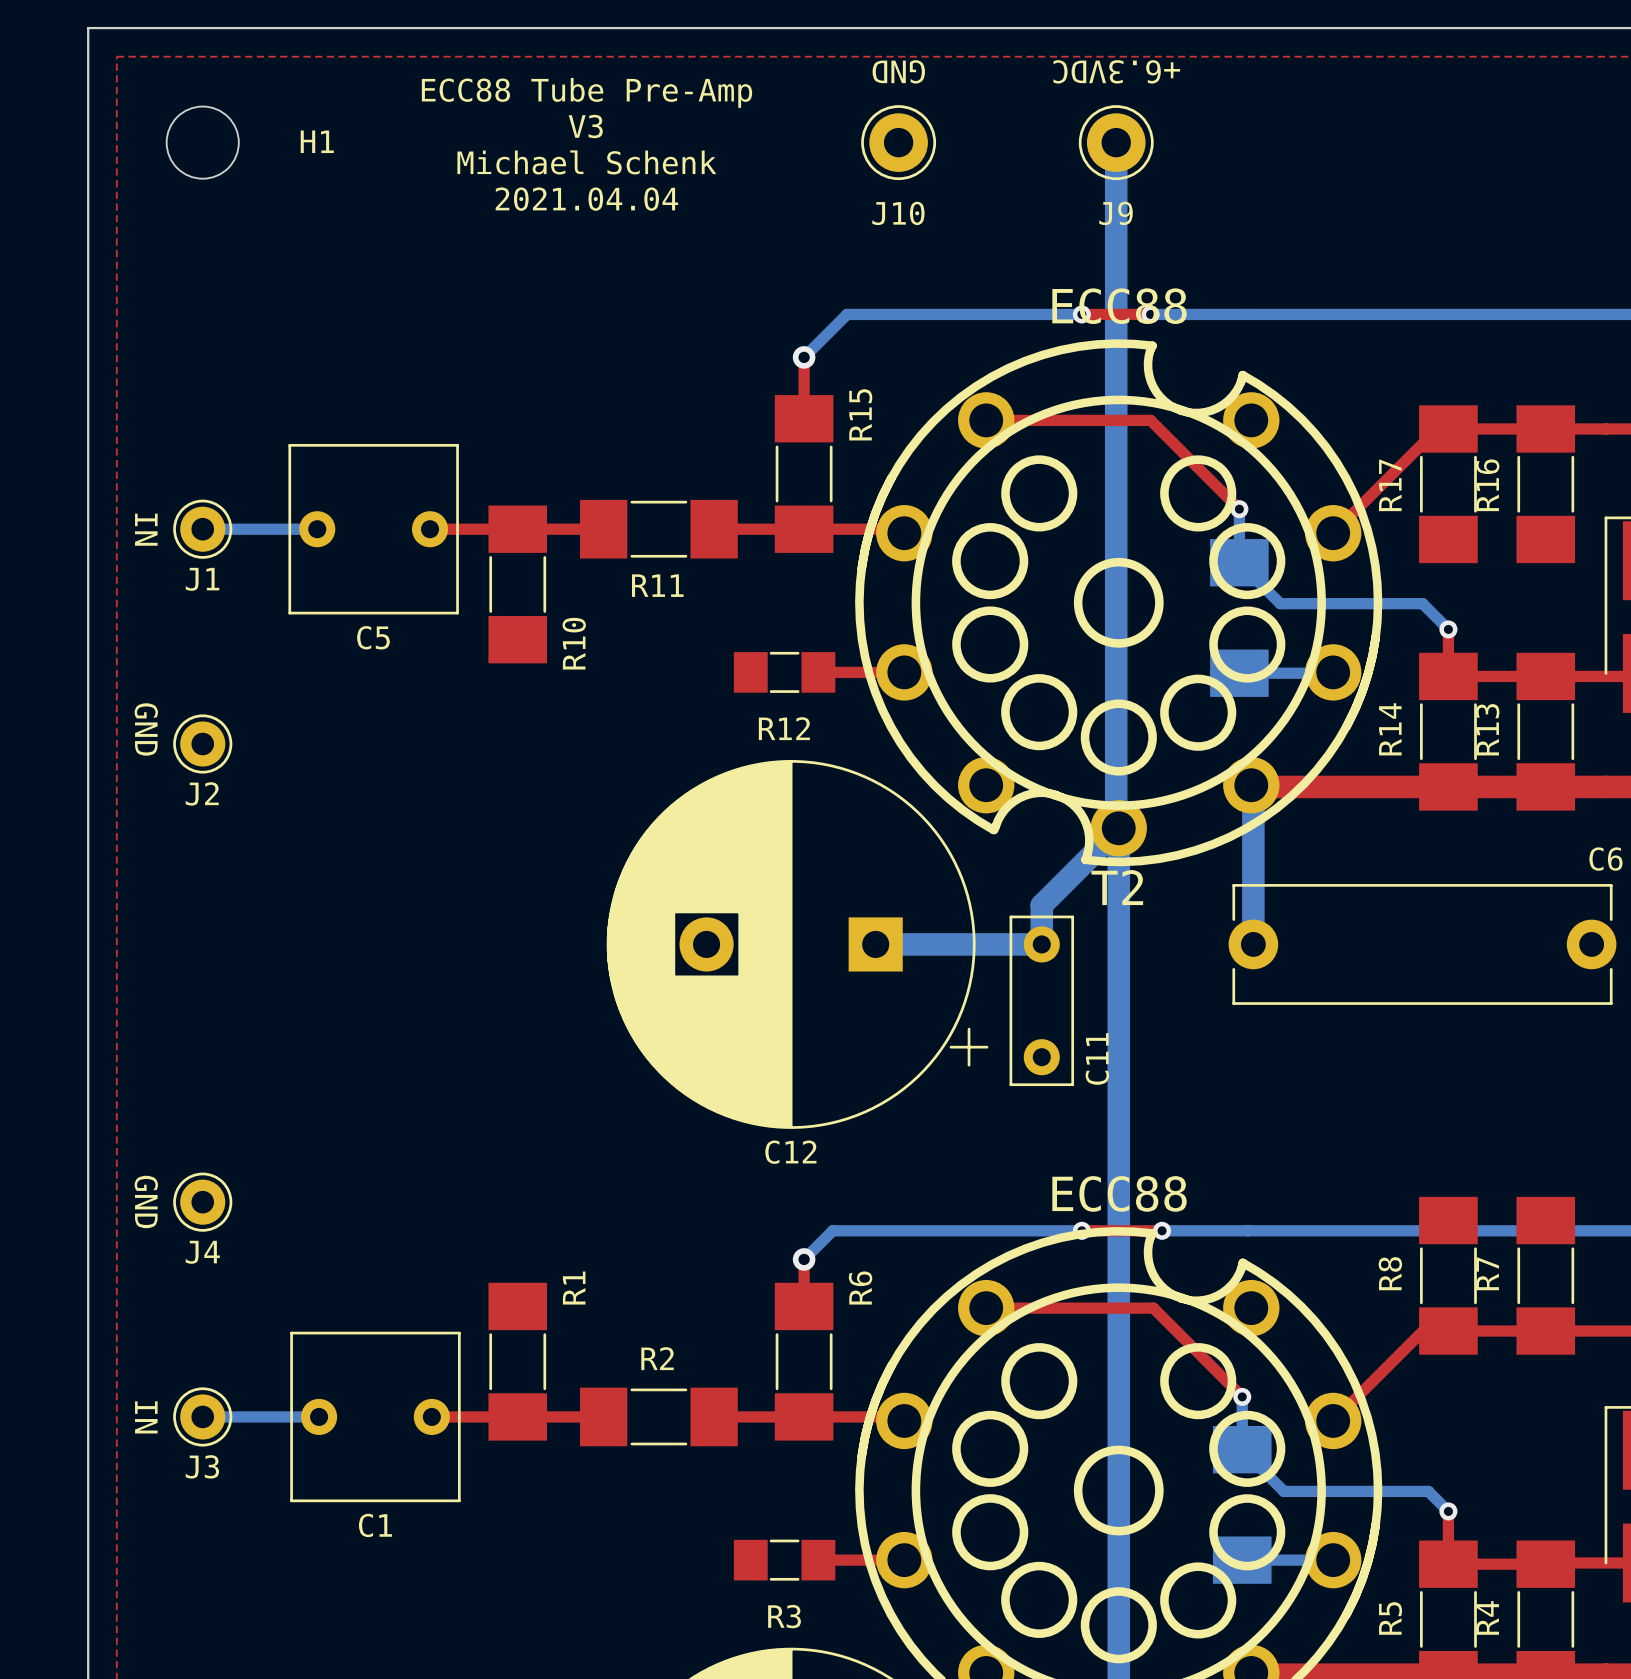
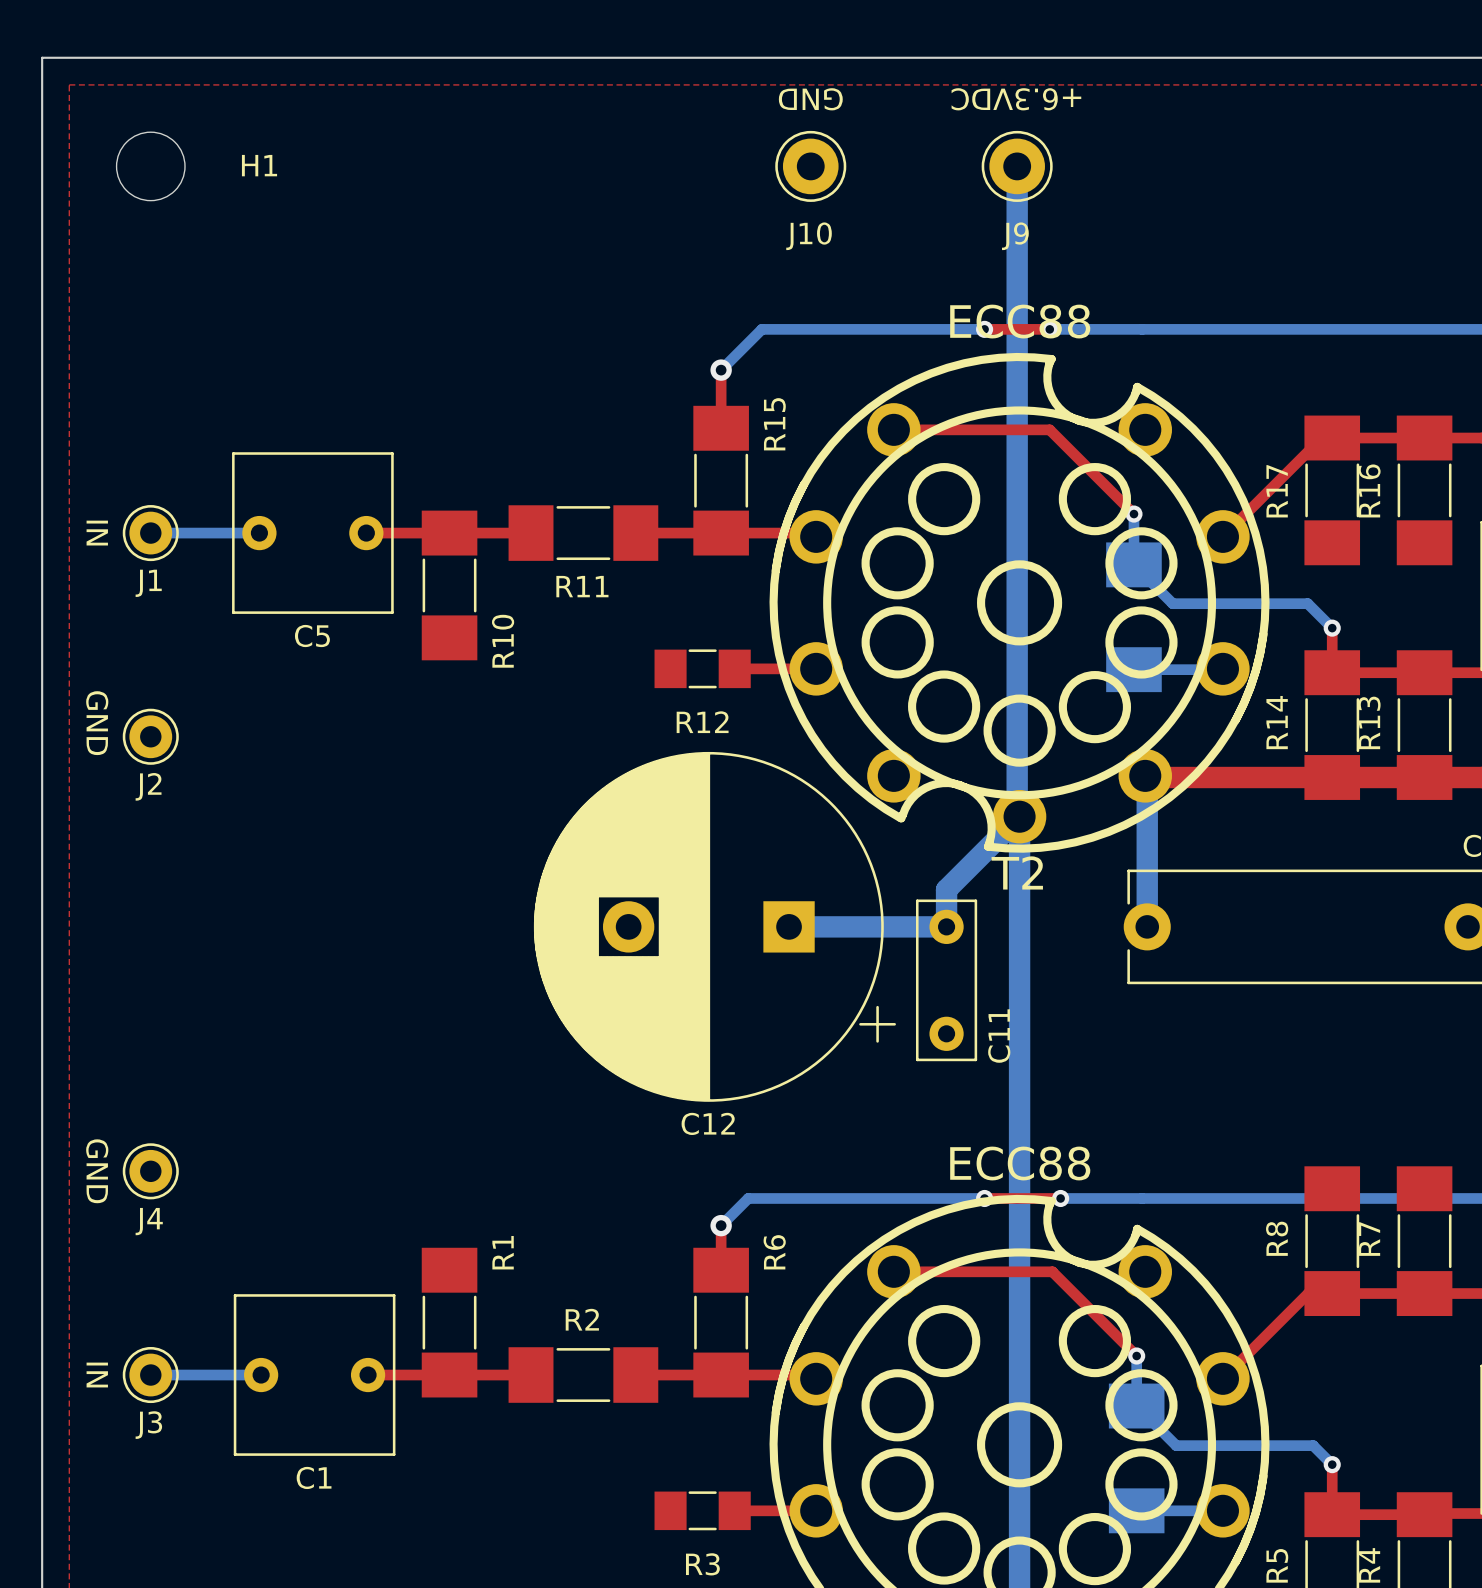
text: ECC88 Tube Pre-Amp (587, 92) -> none
text: V3 (585, 126) -> none
text: Michael Schenk (586, 162) -> none
text: 2021.04.04 (586, 199) -> none

